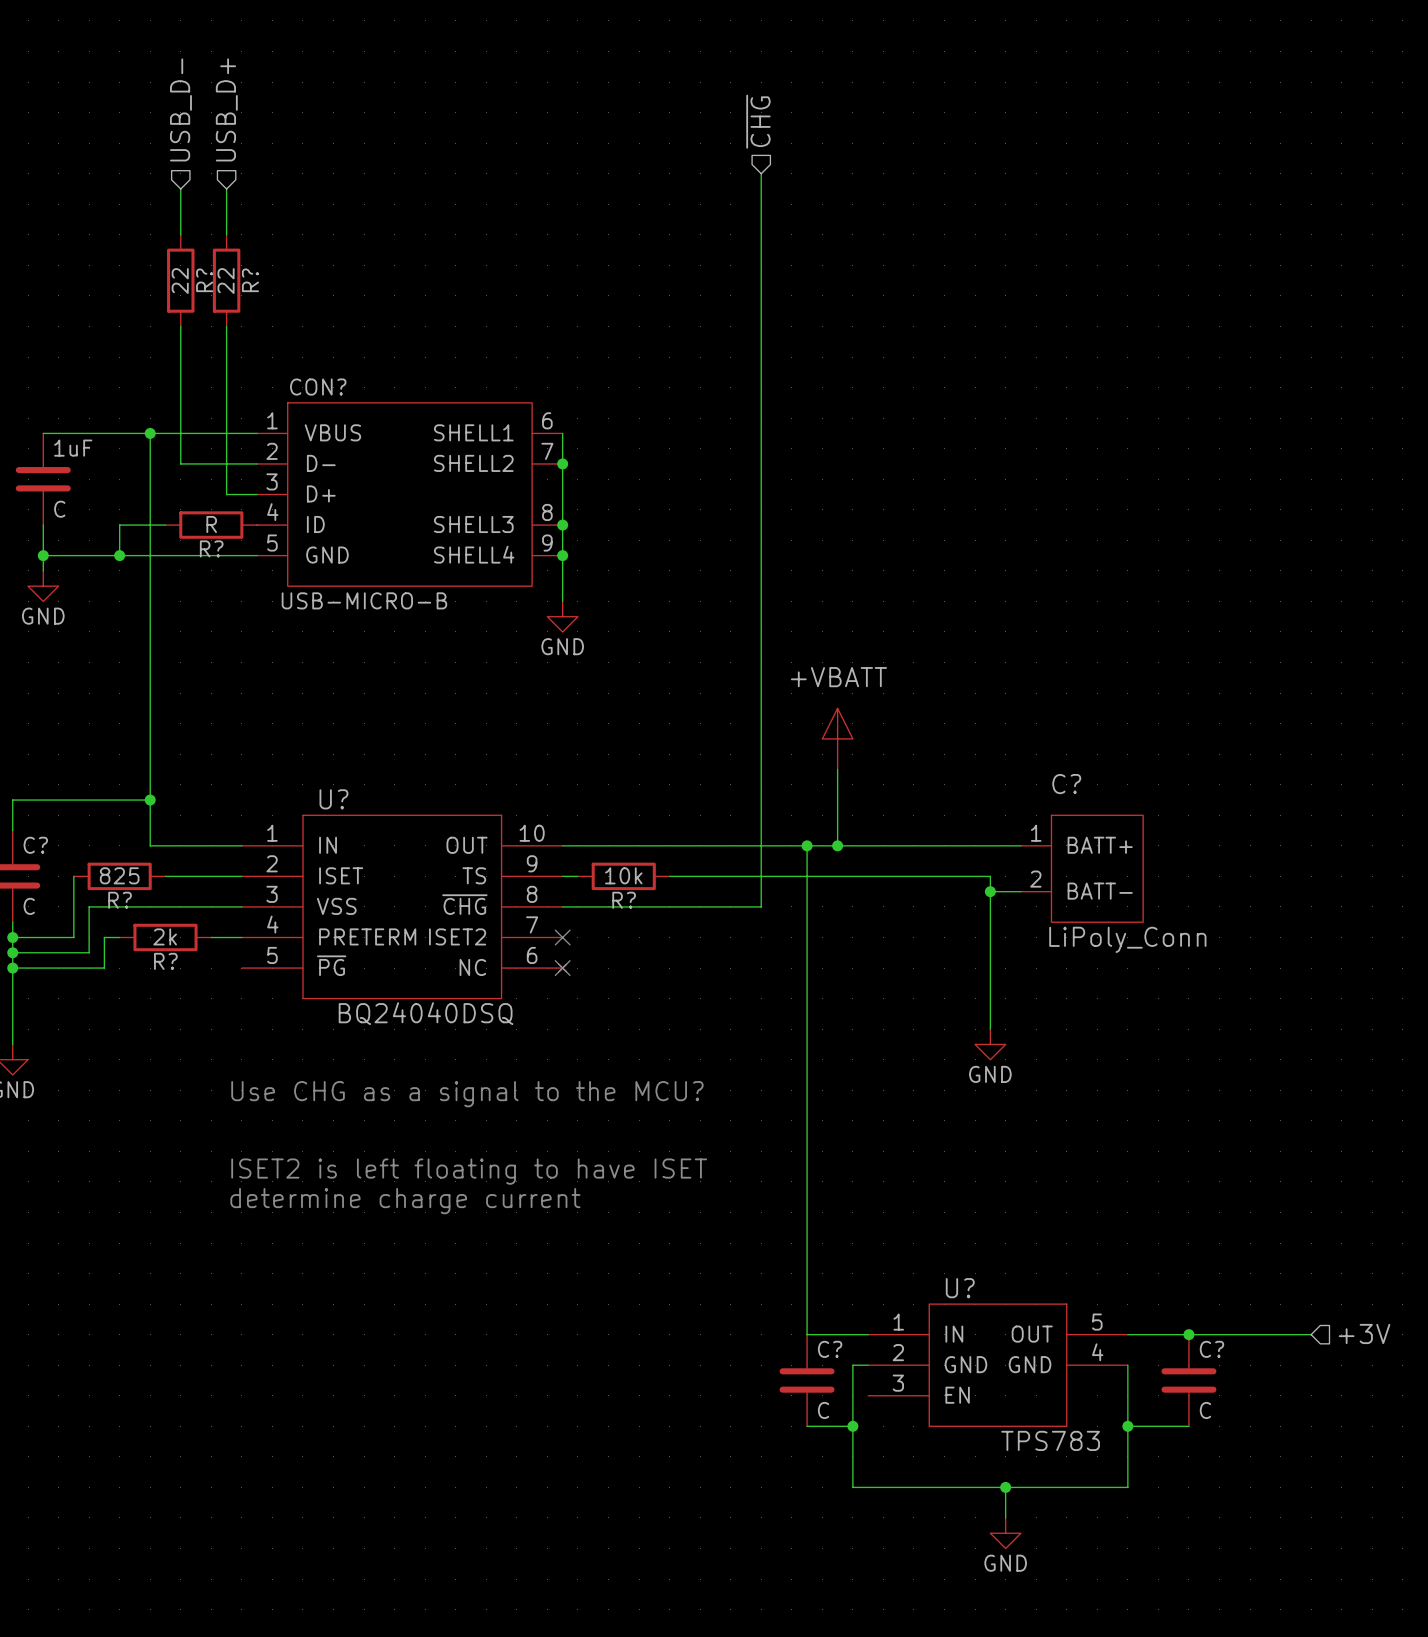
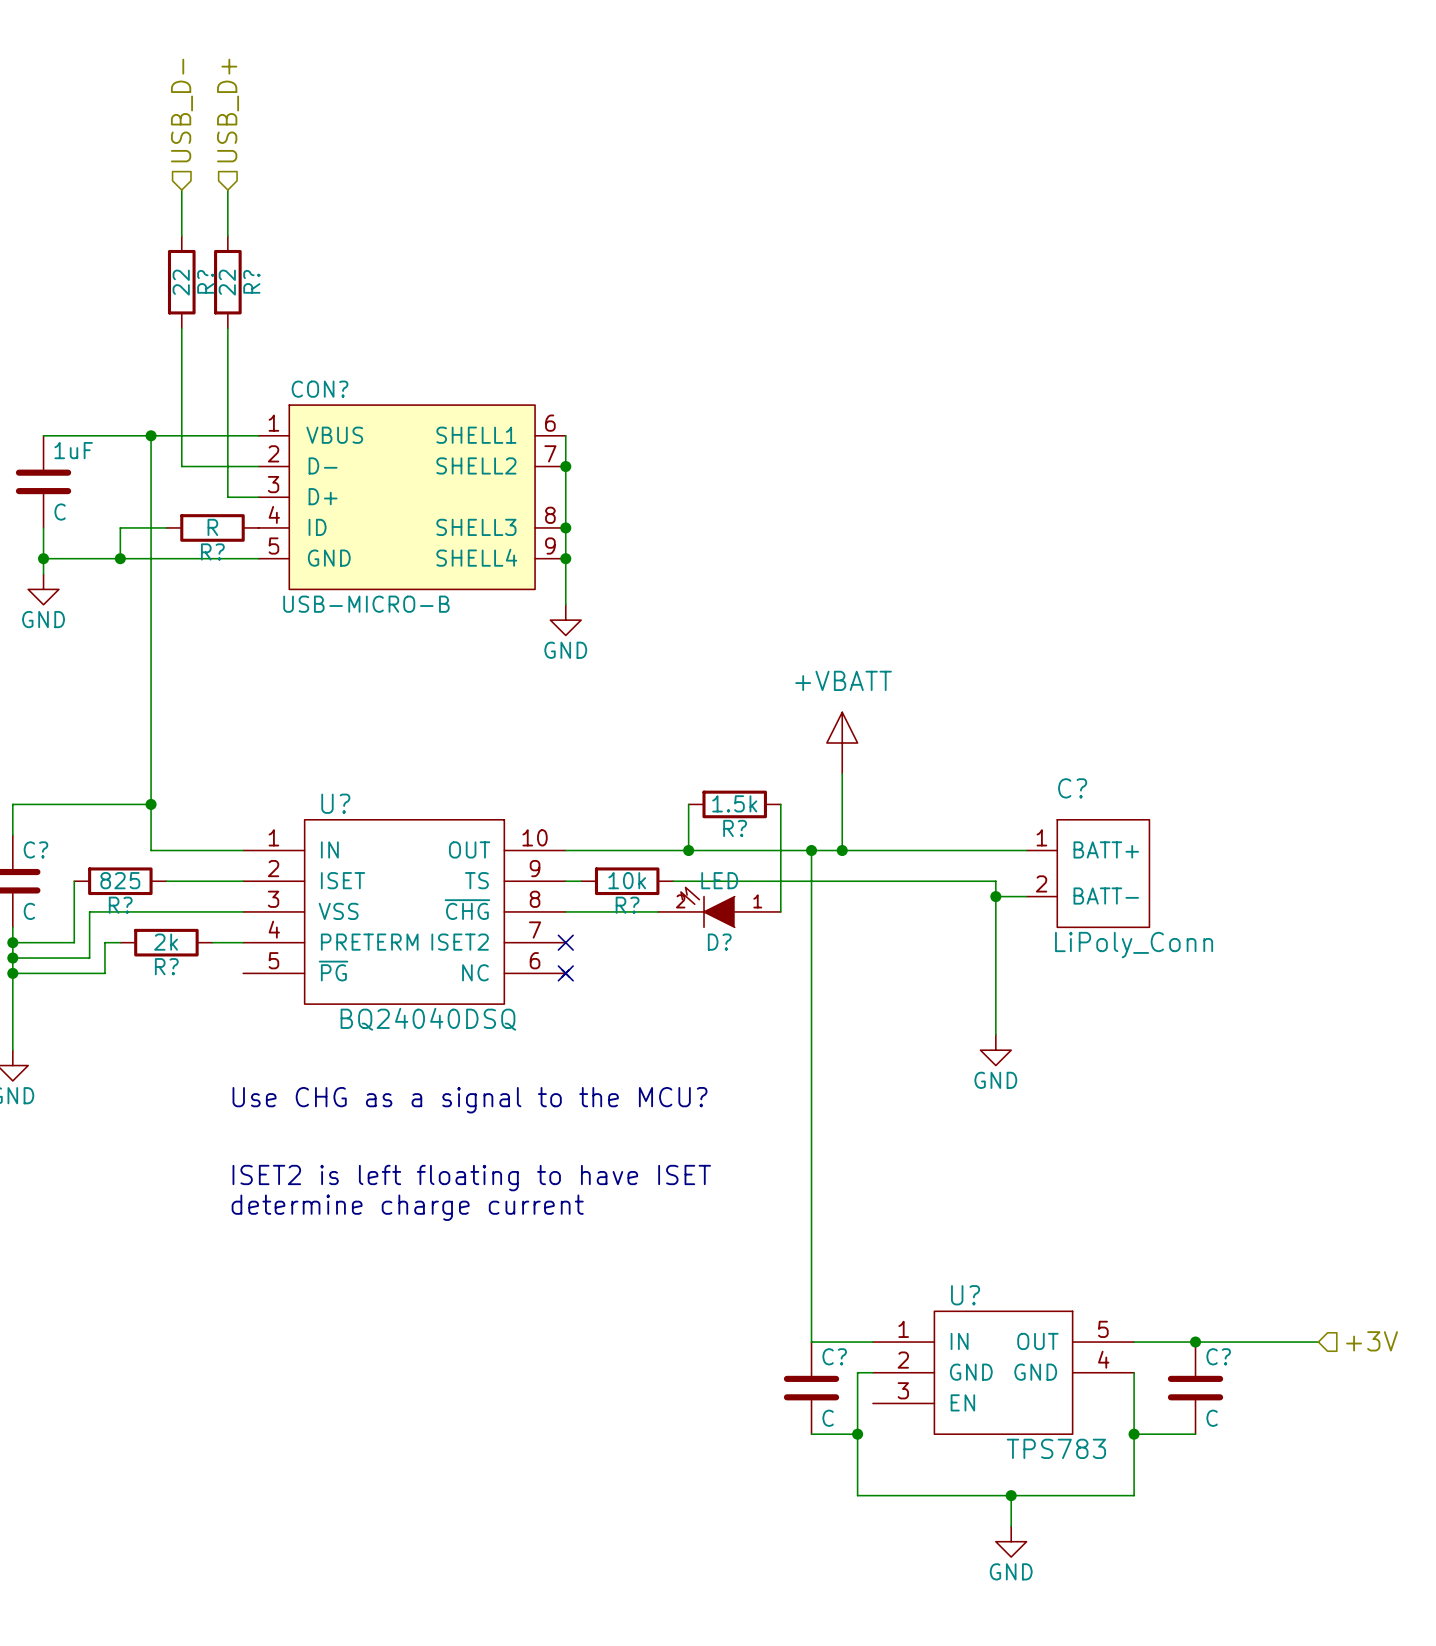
hierarchical label: ~{CHG} (758, 121) -> none
wire: (761, 173) (761, 906) (654, 906) -> none
wire: none -> (688, 804) (688, 850)
R?: none -> 1.5k (734, 804)
wire: none -> (780, 804) (780, 911)
junction: none -> (688, 850)
D?: none -> LED (719, 907)

